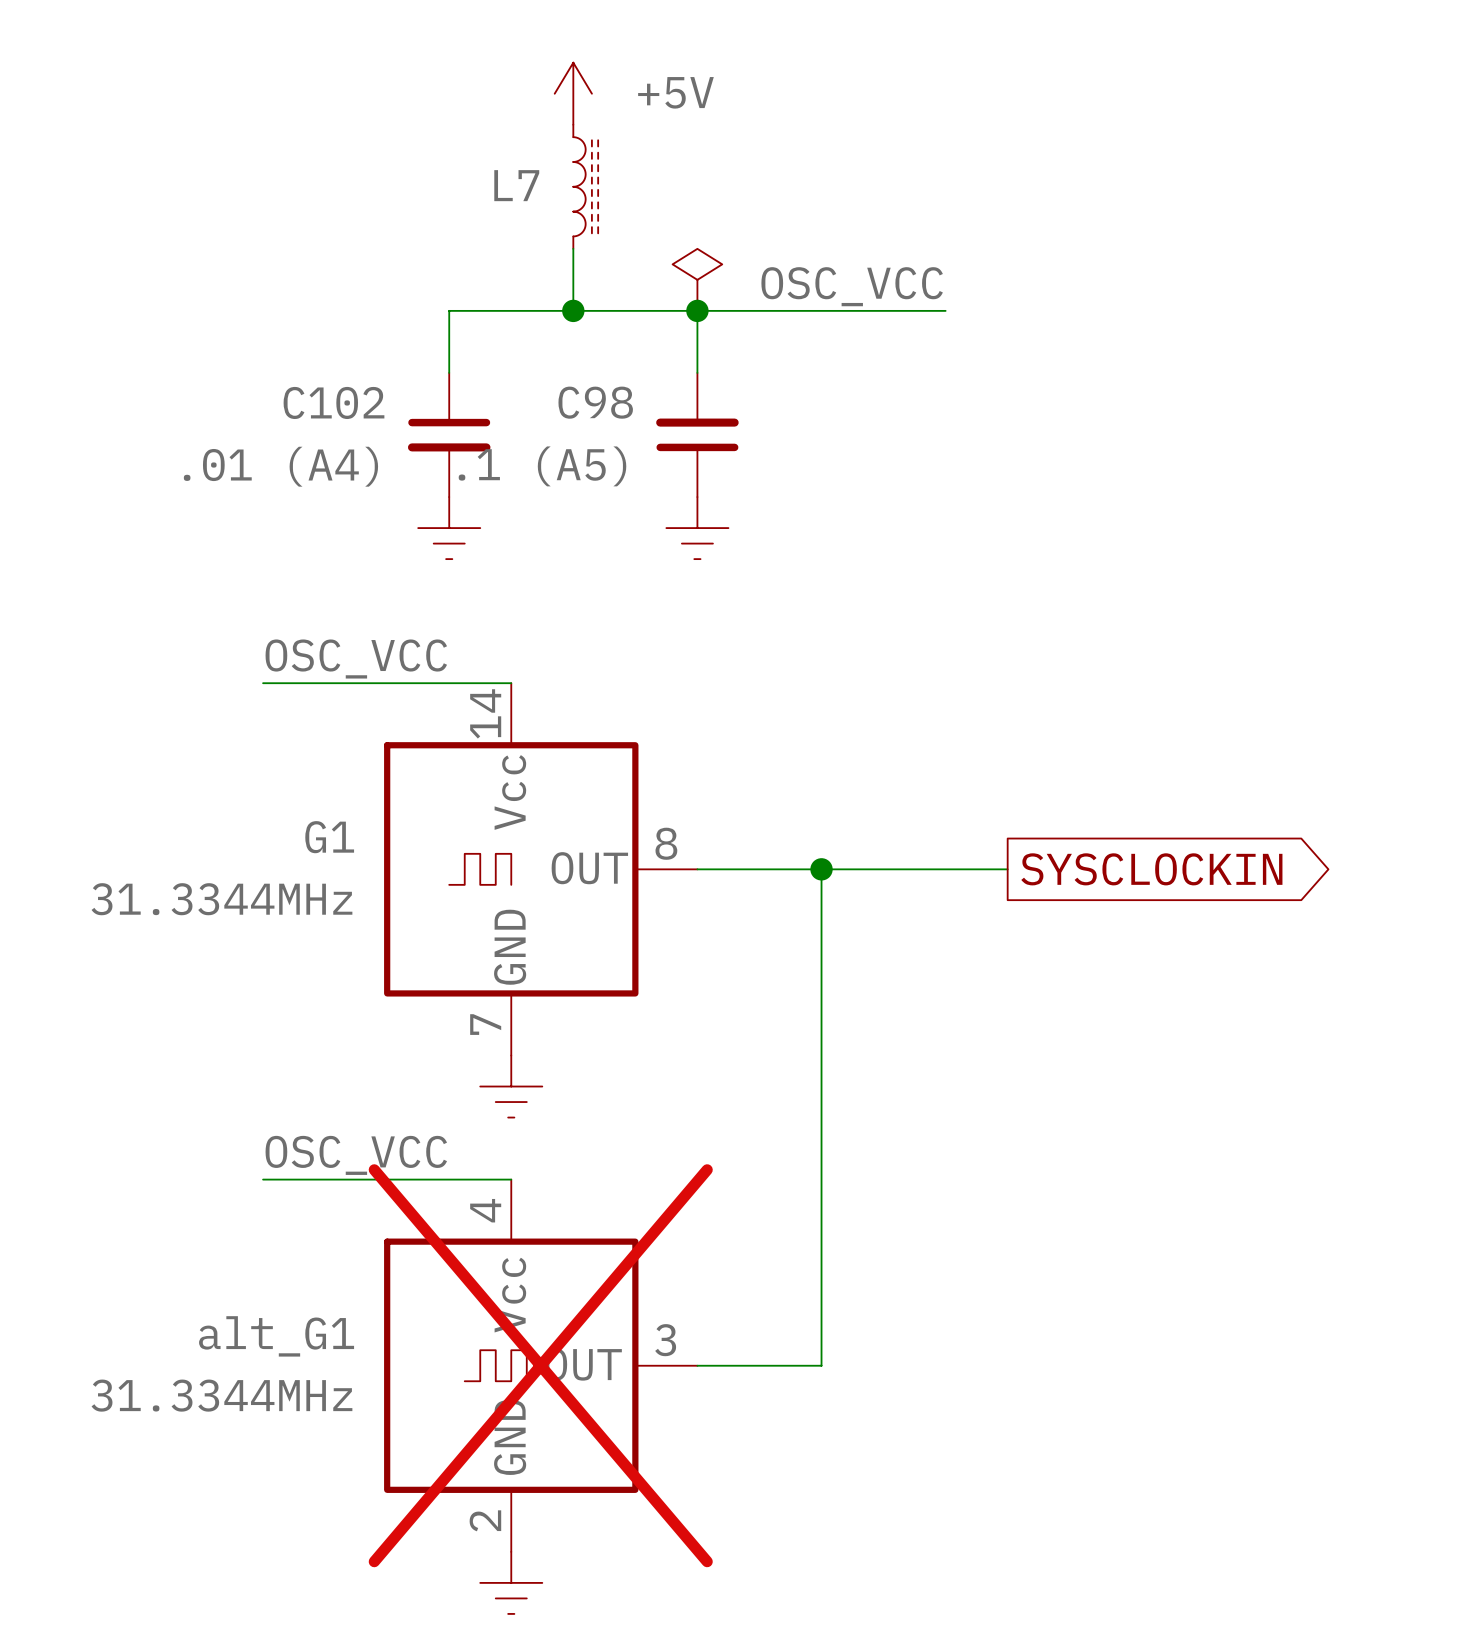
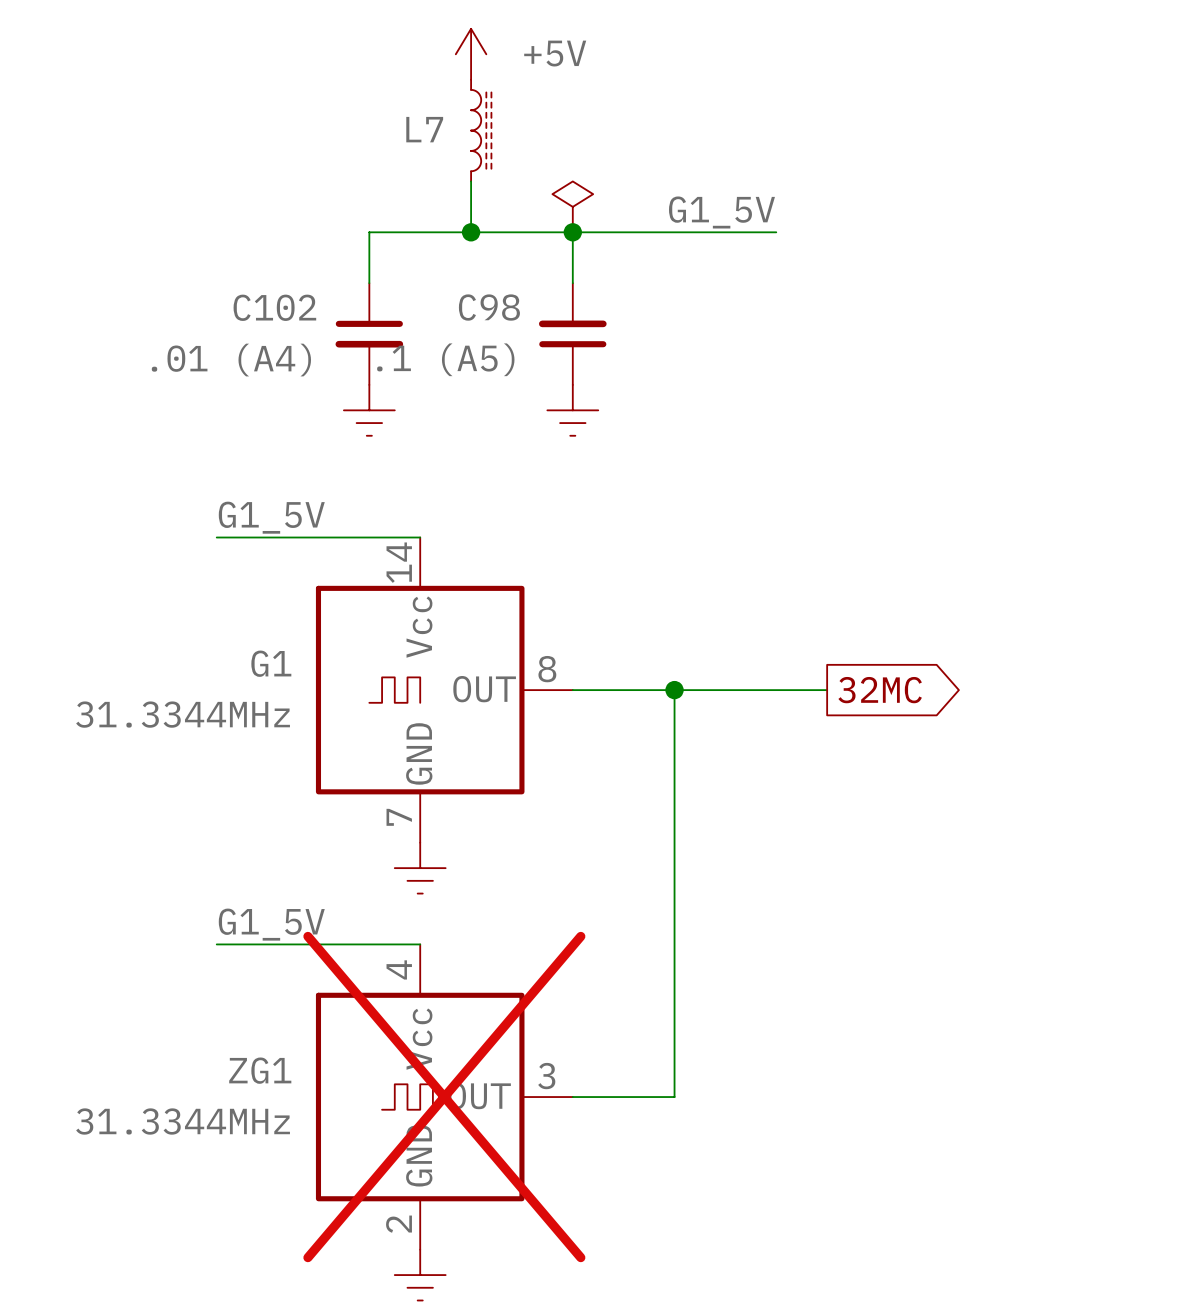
label: OSC_VCC (852, 286) -> G1_5V (721, 212)
label: OSC_VCC (356, 659) -> G1_5V (271, 517)
global label: SYSCLOCKIN (1151, 869) -> 32MC (880, 690)
label: OSC_VCC (356, 1155) -> G1_5V (271, 924)
alt_G1 name: alt_G1 (276, 1336) -> ZG1 (260, 1070)

